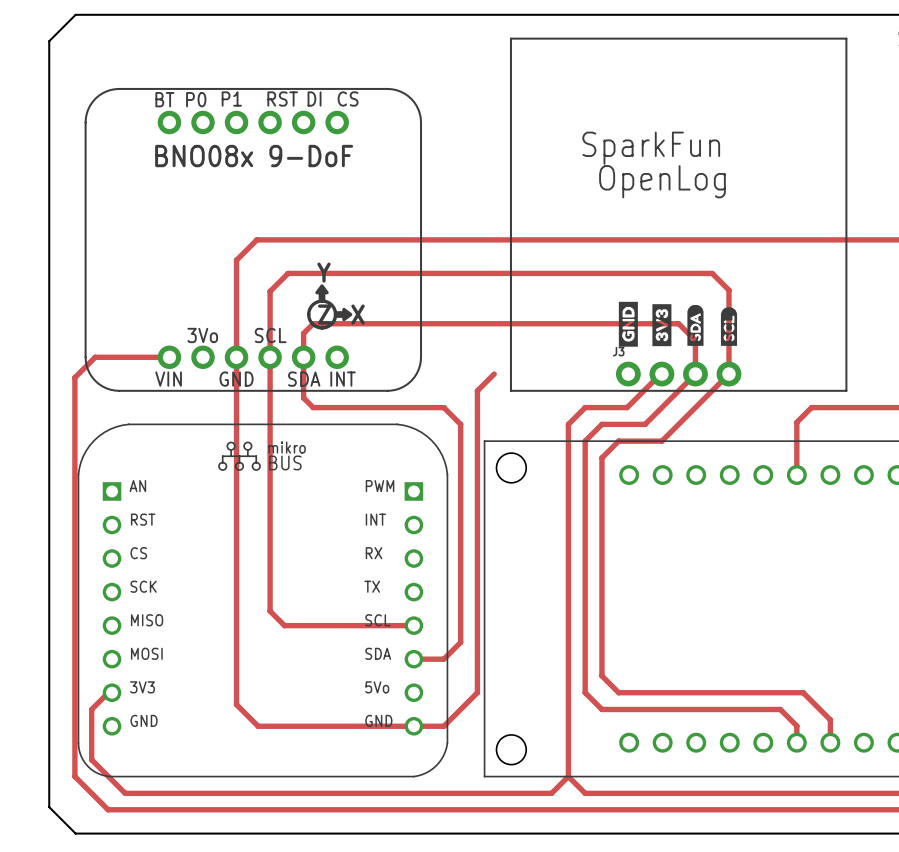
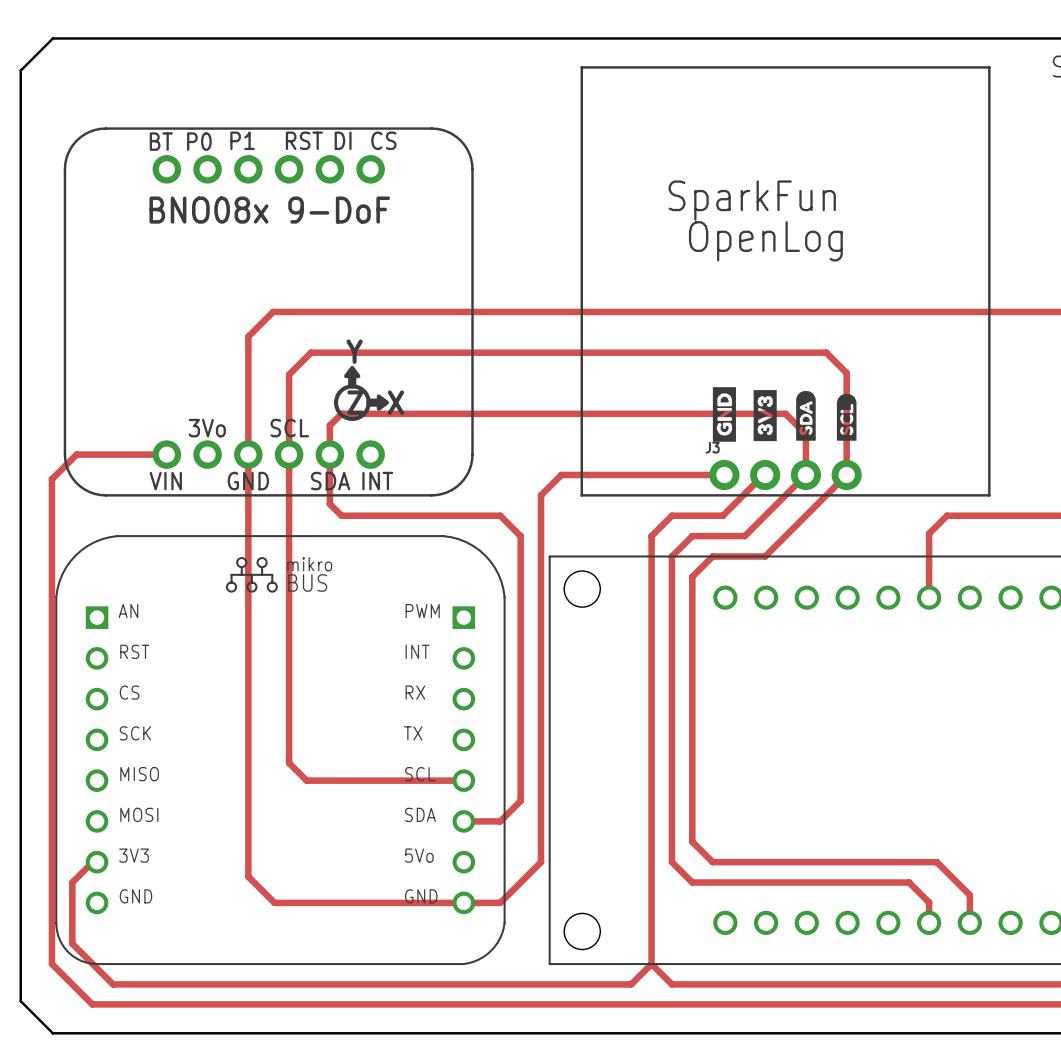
track: none -> (561, 474) (724, 474)

